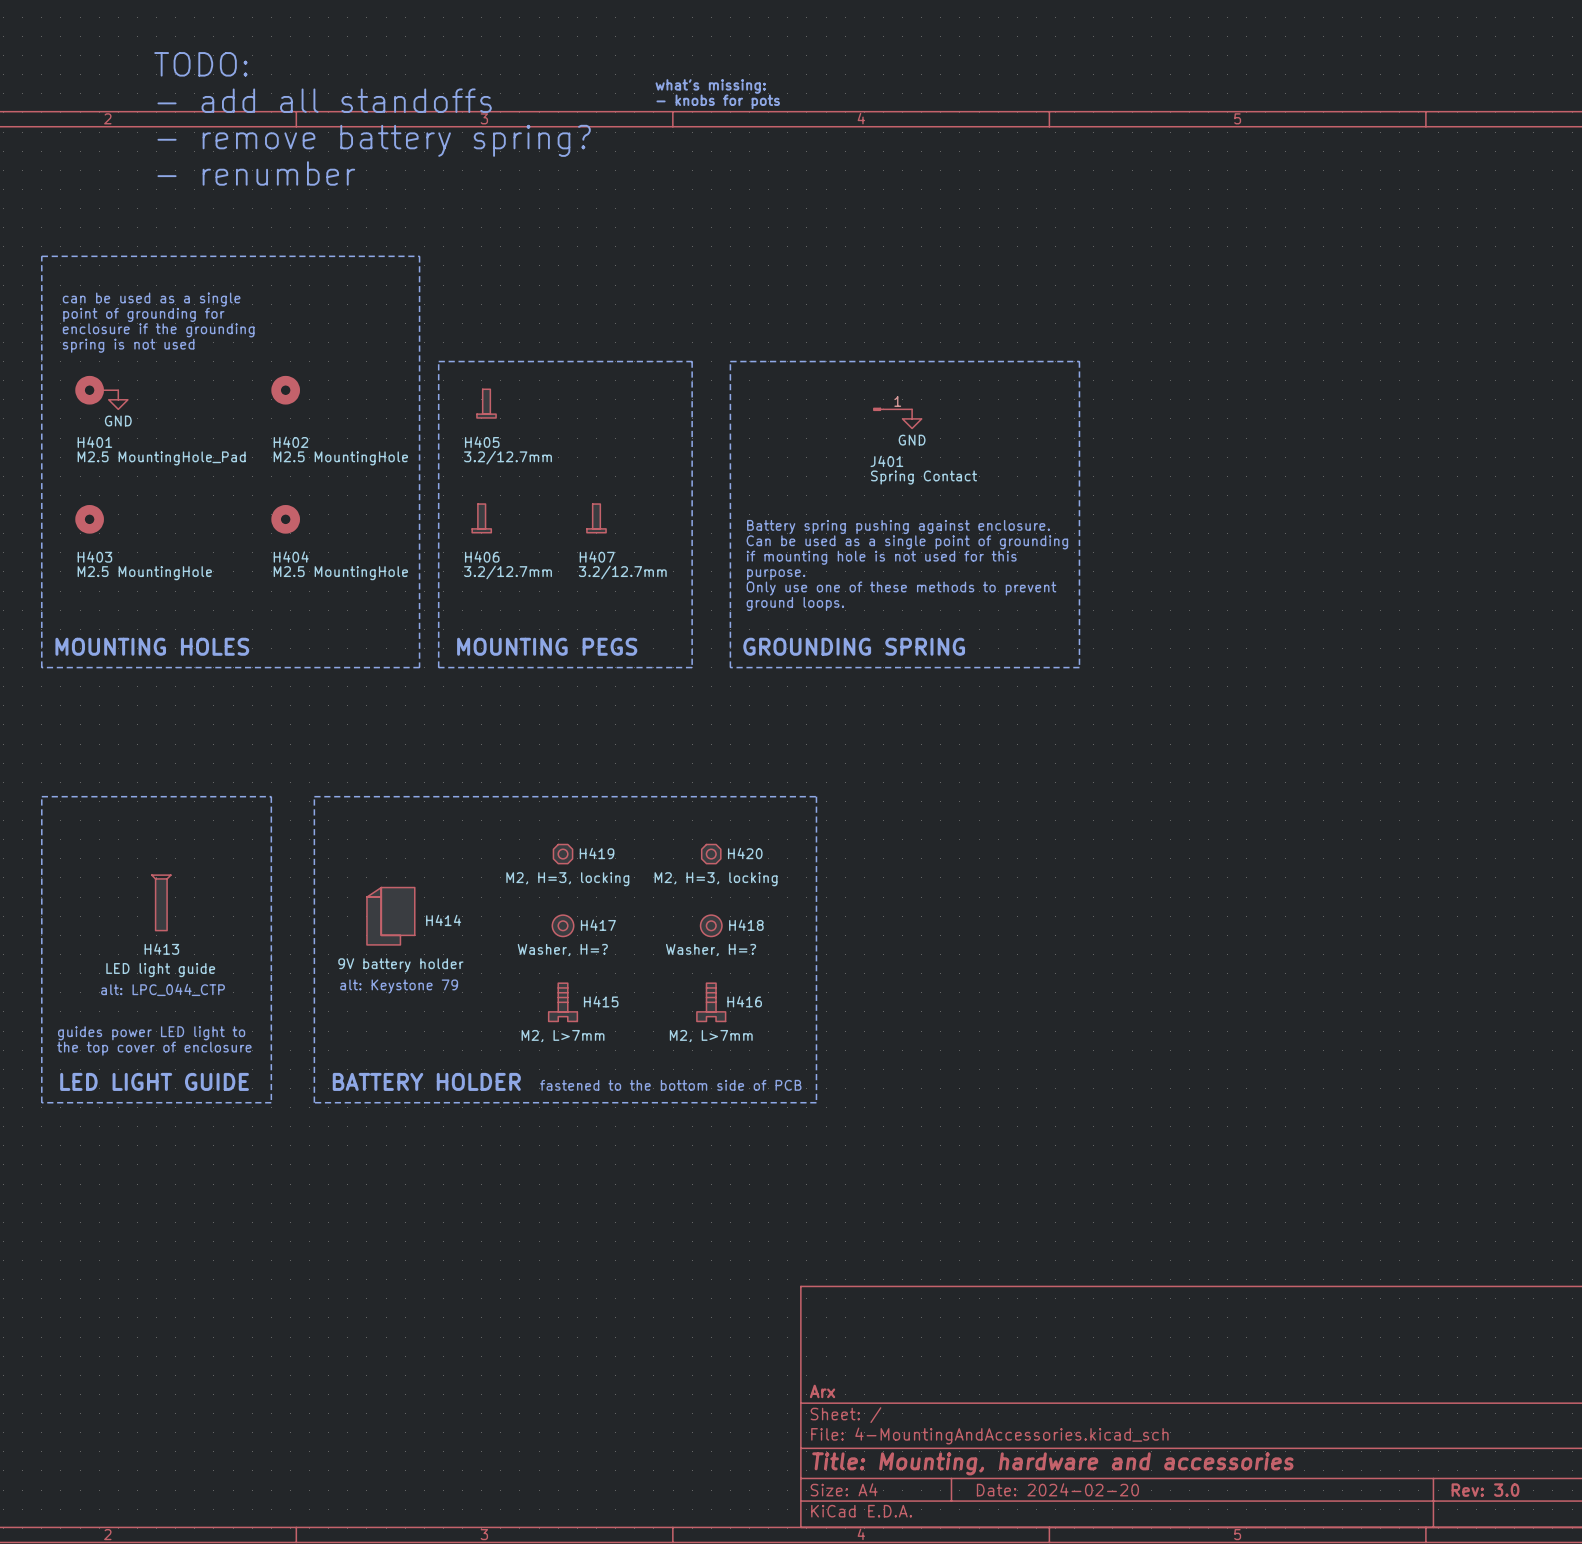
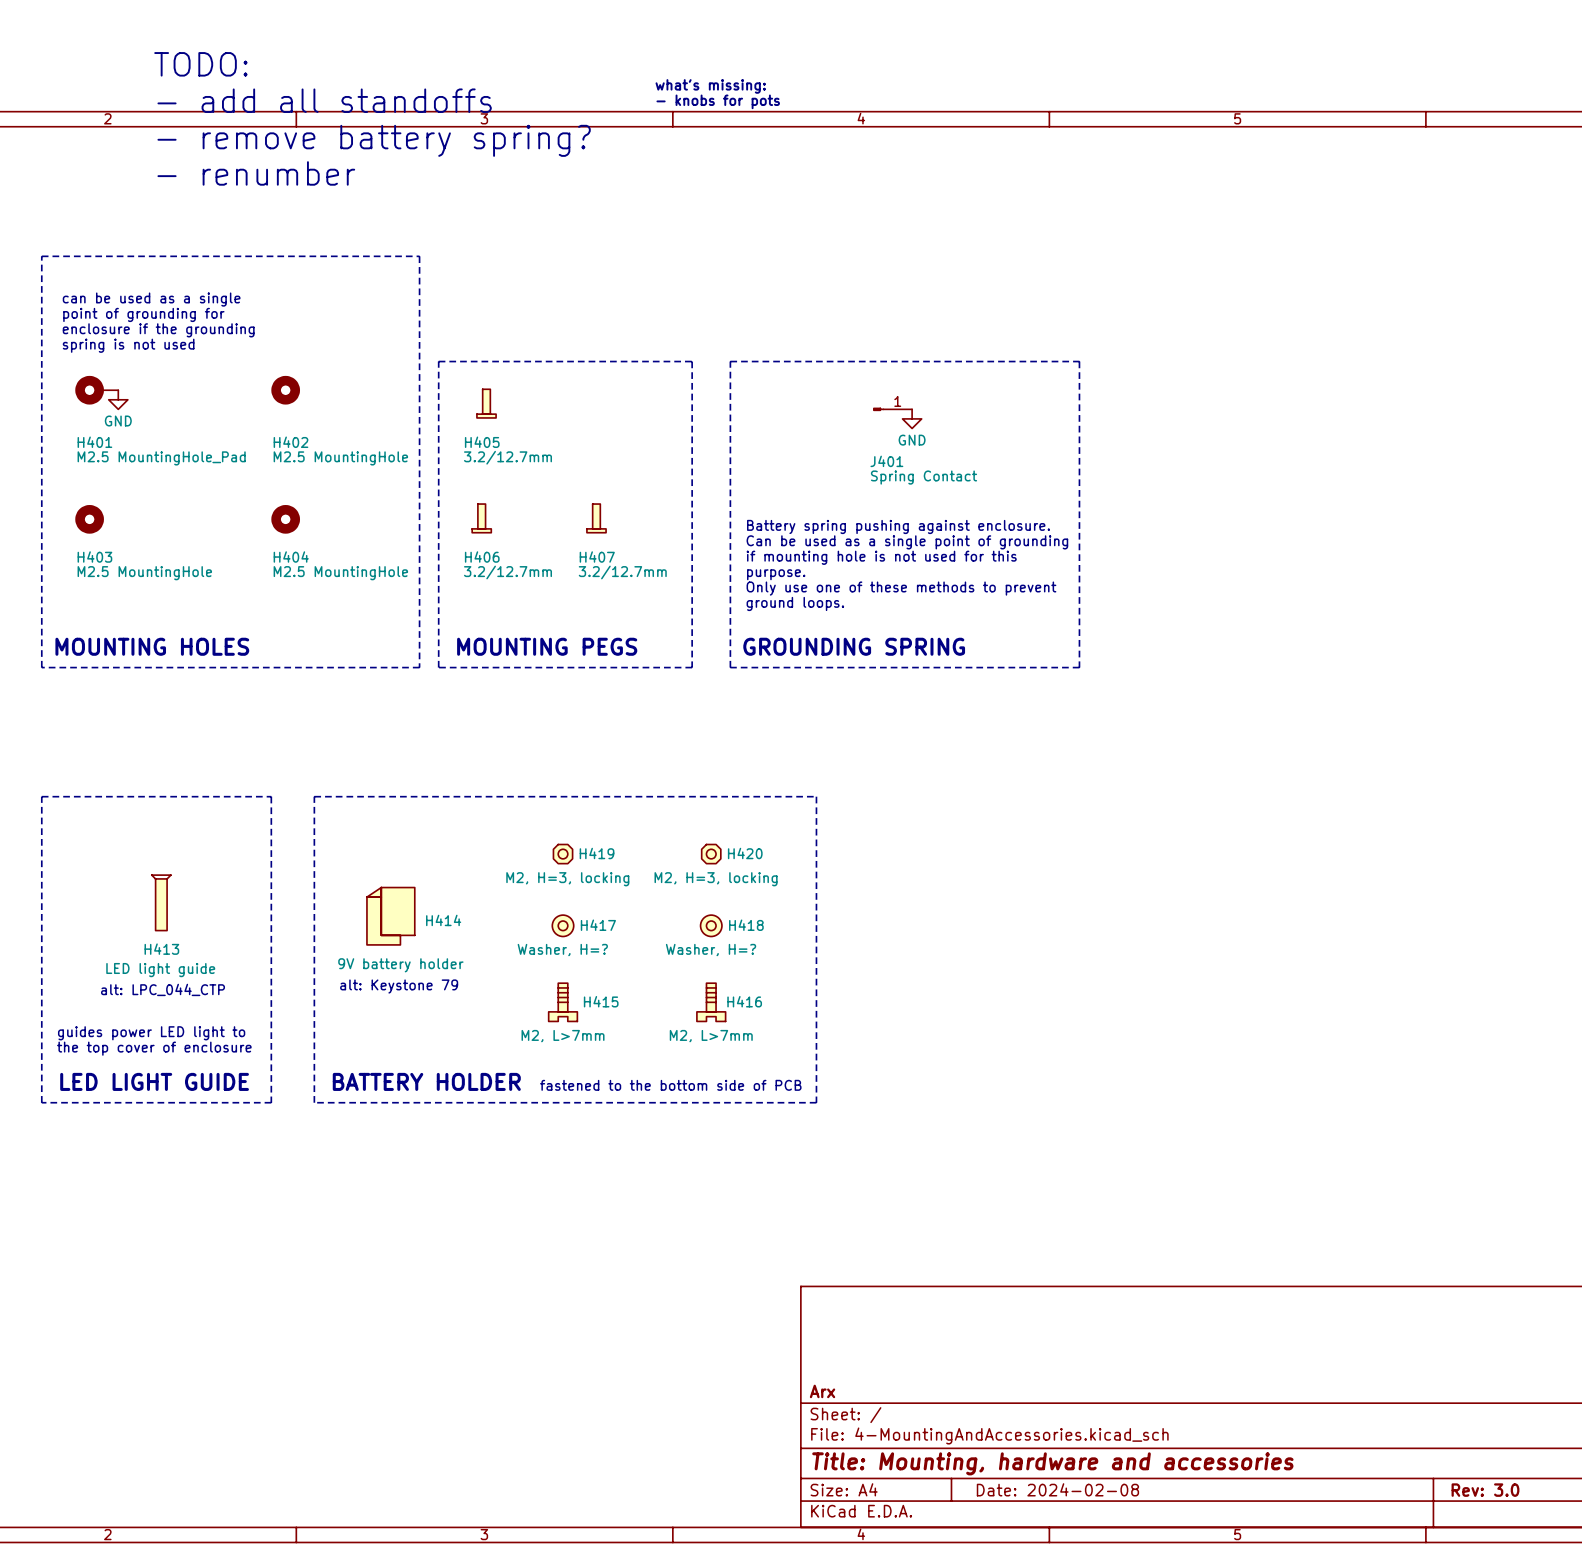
title block: Date: 2024-02-20 (1057, 1489) -> Date: 2024-02-08 (1057, 1489)

